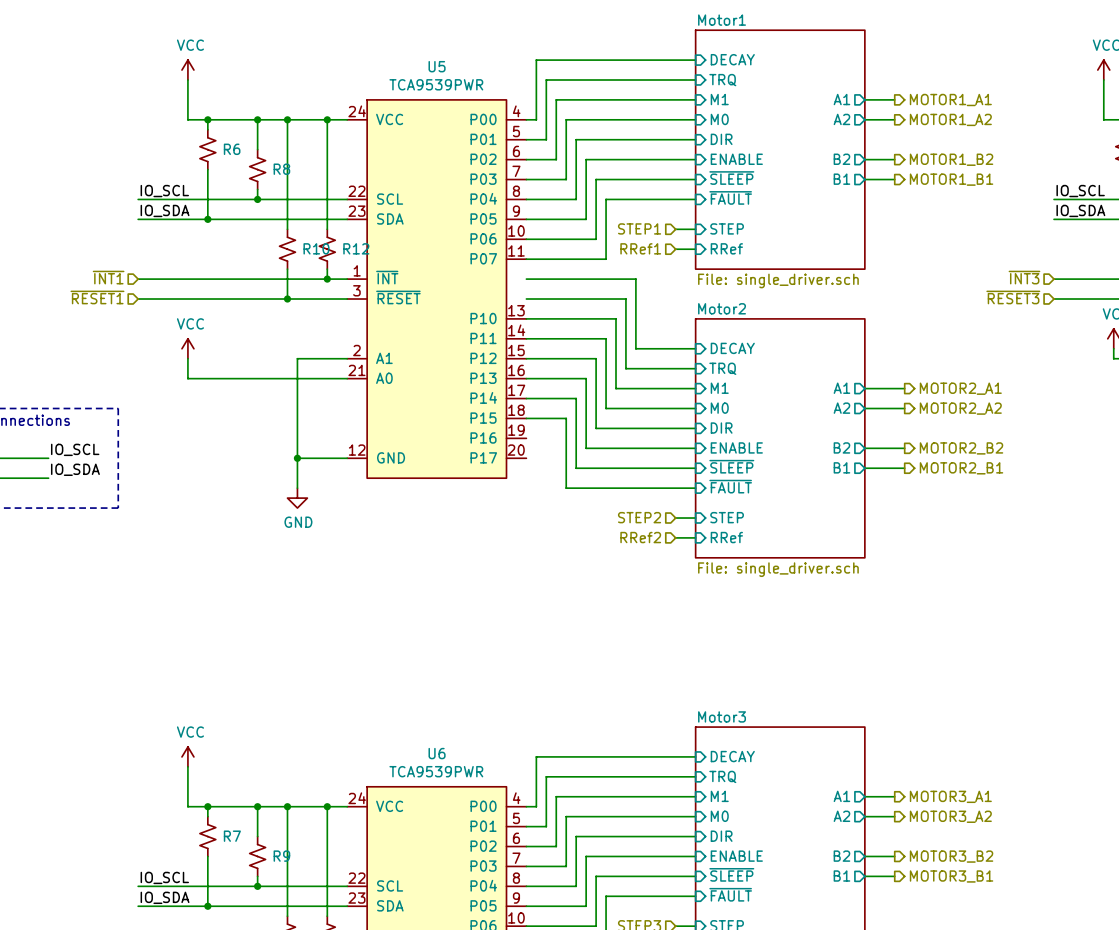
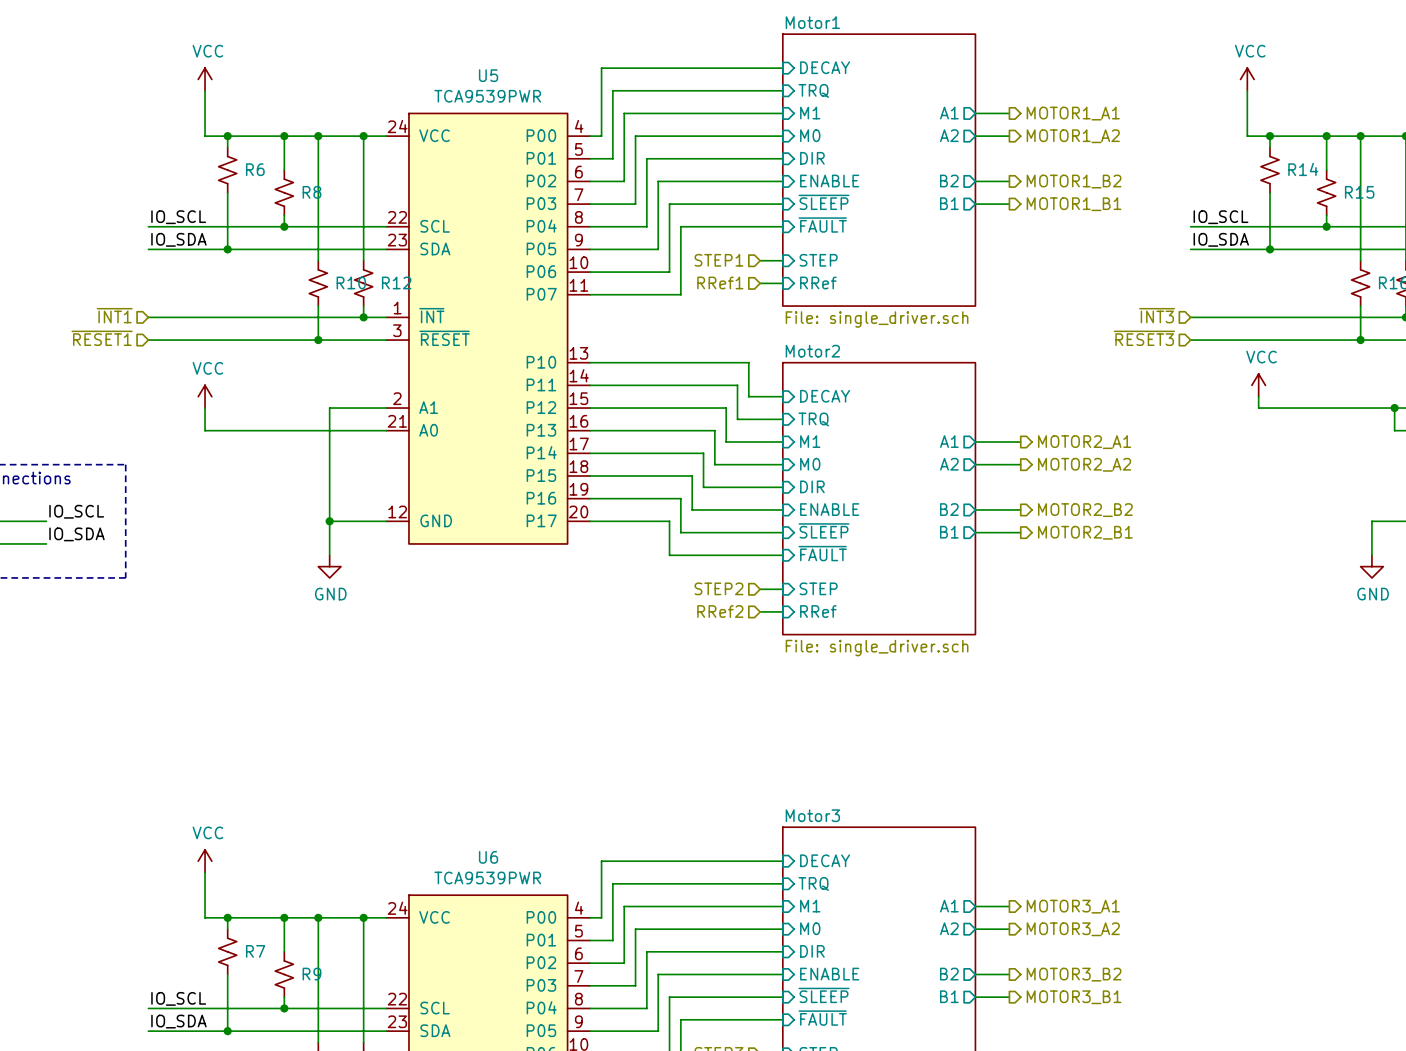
wire: (526, 279) (635, 279) (635, 348) (665, 348) -> none
wire: (526, 299) (625, 299) (625, 368) (655, 368) -> none
wire: (616, 318) (616, 388) (645, 388) -> (692, 362) (748, 362) (748, 396)
wire: (606, 338) (606, 408) (635, 408) -> (680, 385) (737, 385) (737, 419)
wire: (596, 358) (596, 428) (625, 428) -> (669, 408) (726, 408) (726, 442)
wire: (586, 378) (586, 448) (616, 448) -> (658, 430) (714, 430) (714, 464)
wire: (576, 398) (576, 468) (606, 468) -> (646, 453) (703, 453) (703, 487)
wire: (566, 418) (566, 488) (596, 488) -> (635, 475) (692, 475) (692, 509)
wire: none -> (590, 498) (680, 498) (680, 532)
wire: none -> (590, 521) (669, 521) (669, 555)

